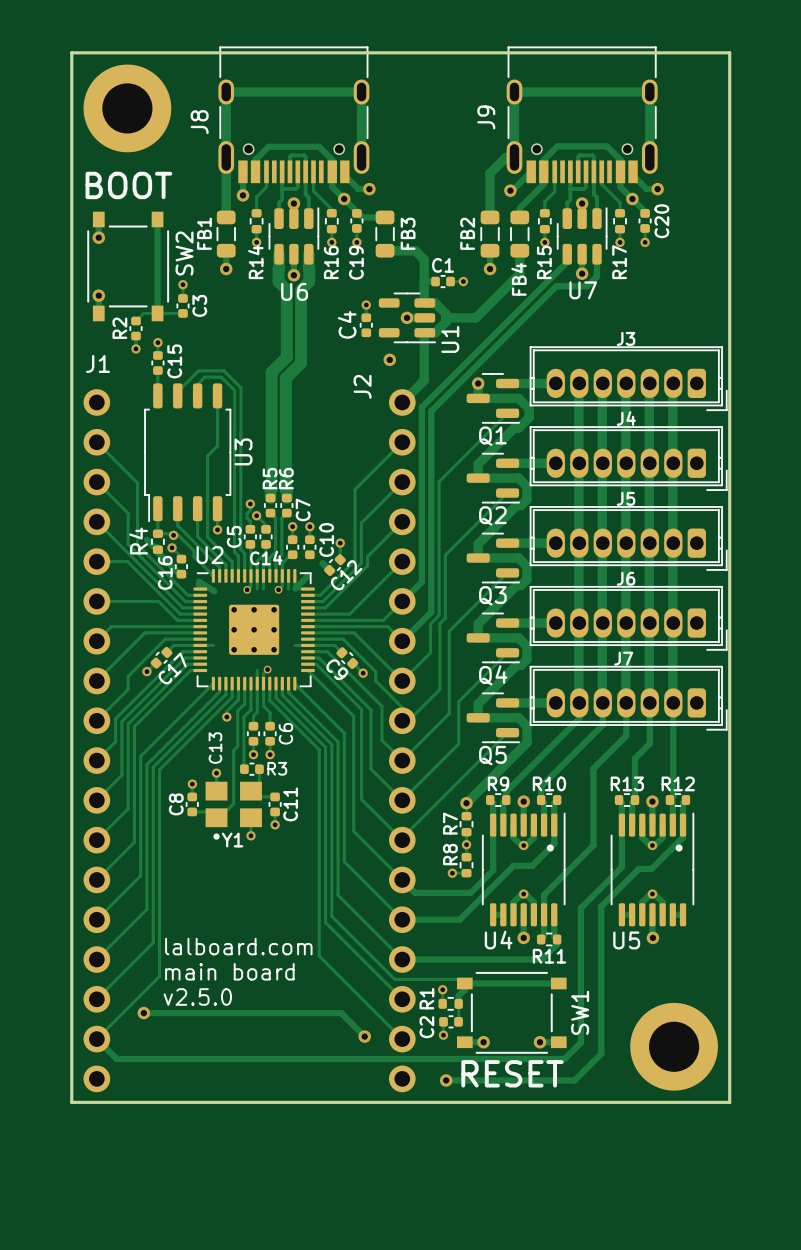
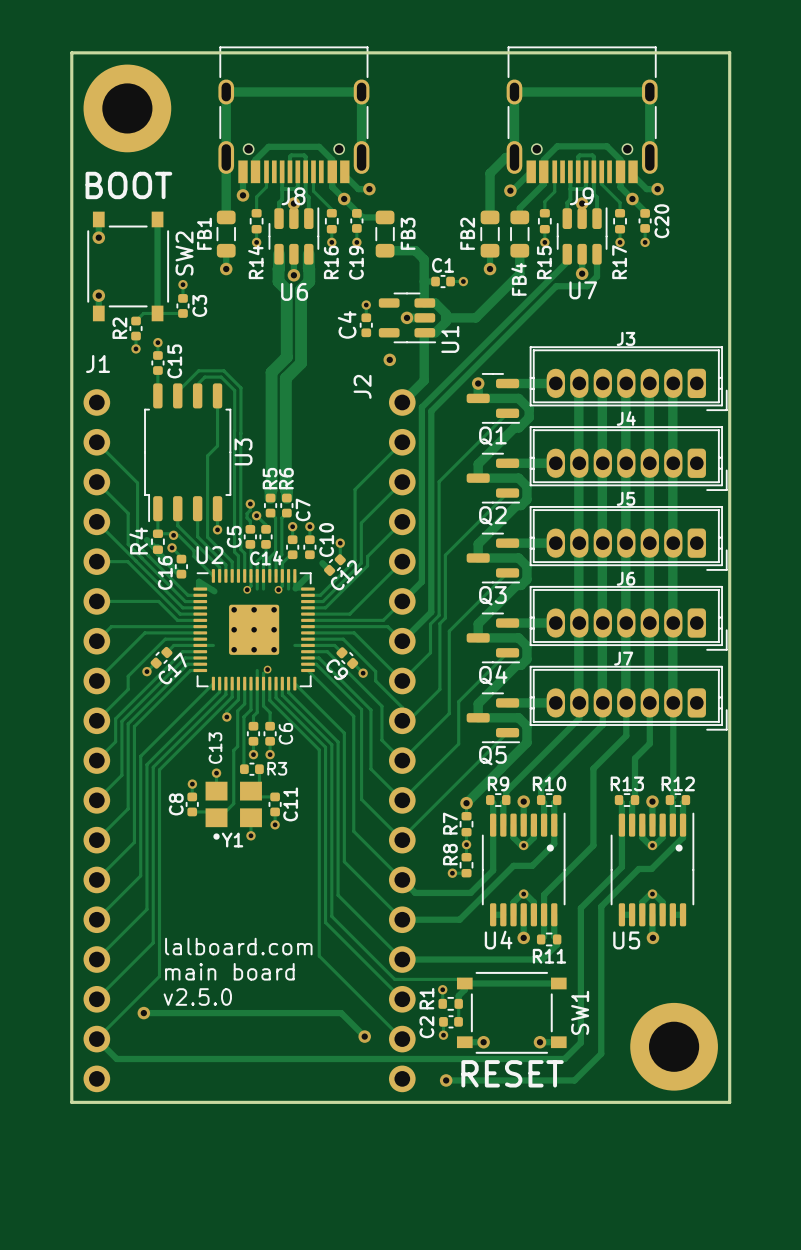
J9 name rotation: 0° (486, 117) -> 90° clockwise (581, 196)
J9 name position: J9 (486, 117) -> J9 (581, 196)
J8 name rotation: 0° (199, 122) -> 90° clockwise (293, 196)
J8 name position: J8 (199, 122) -> J8 (293, 196)

